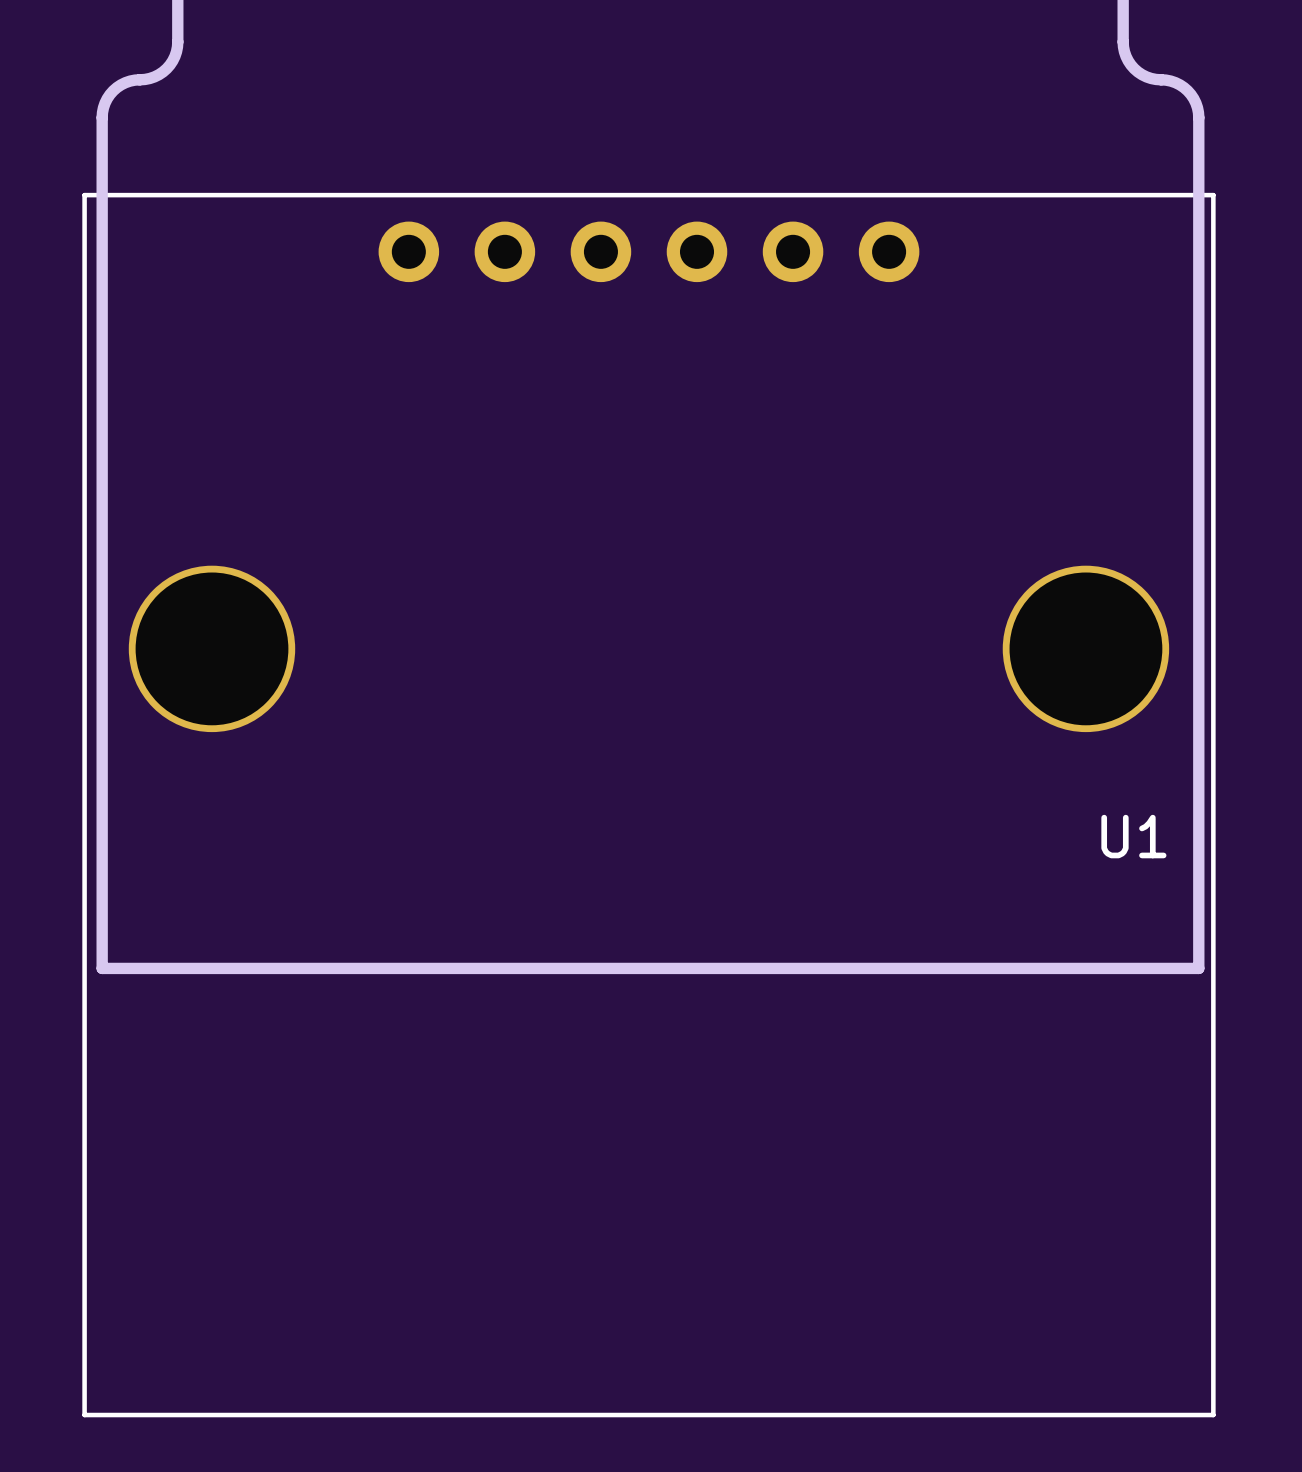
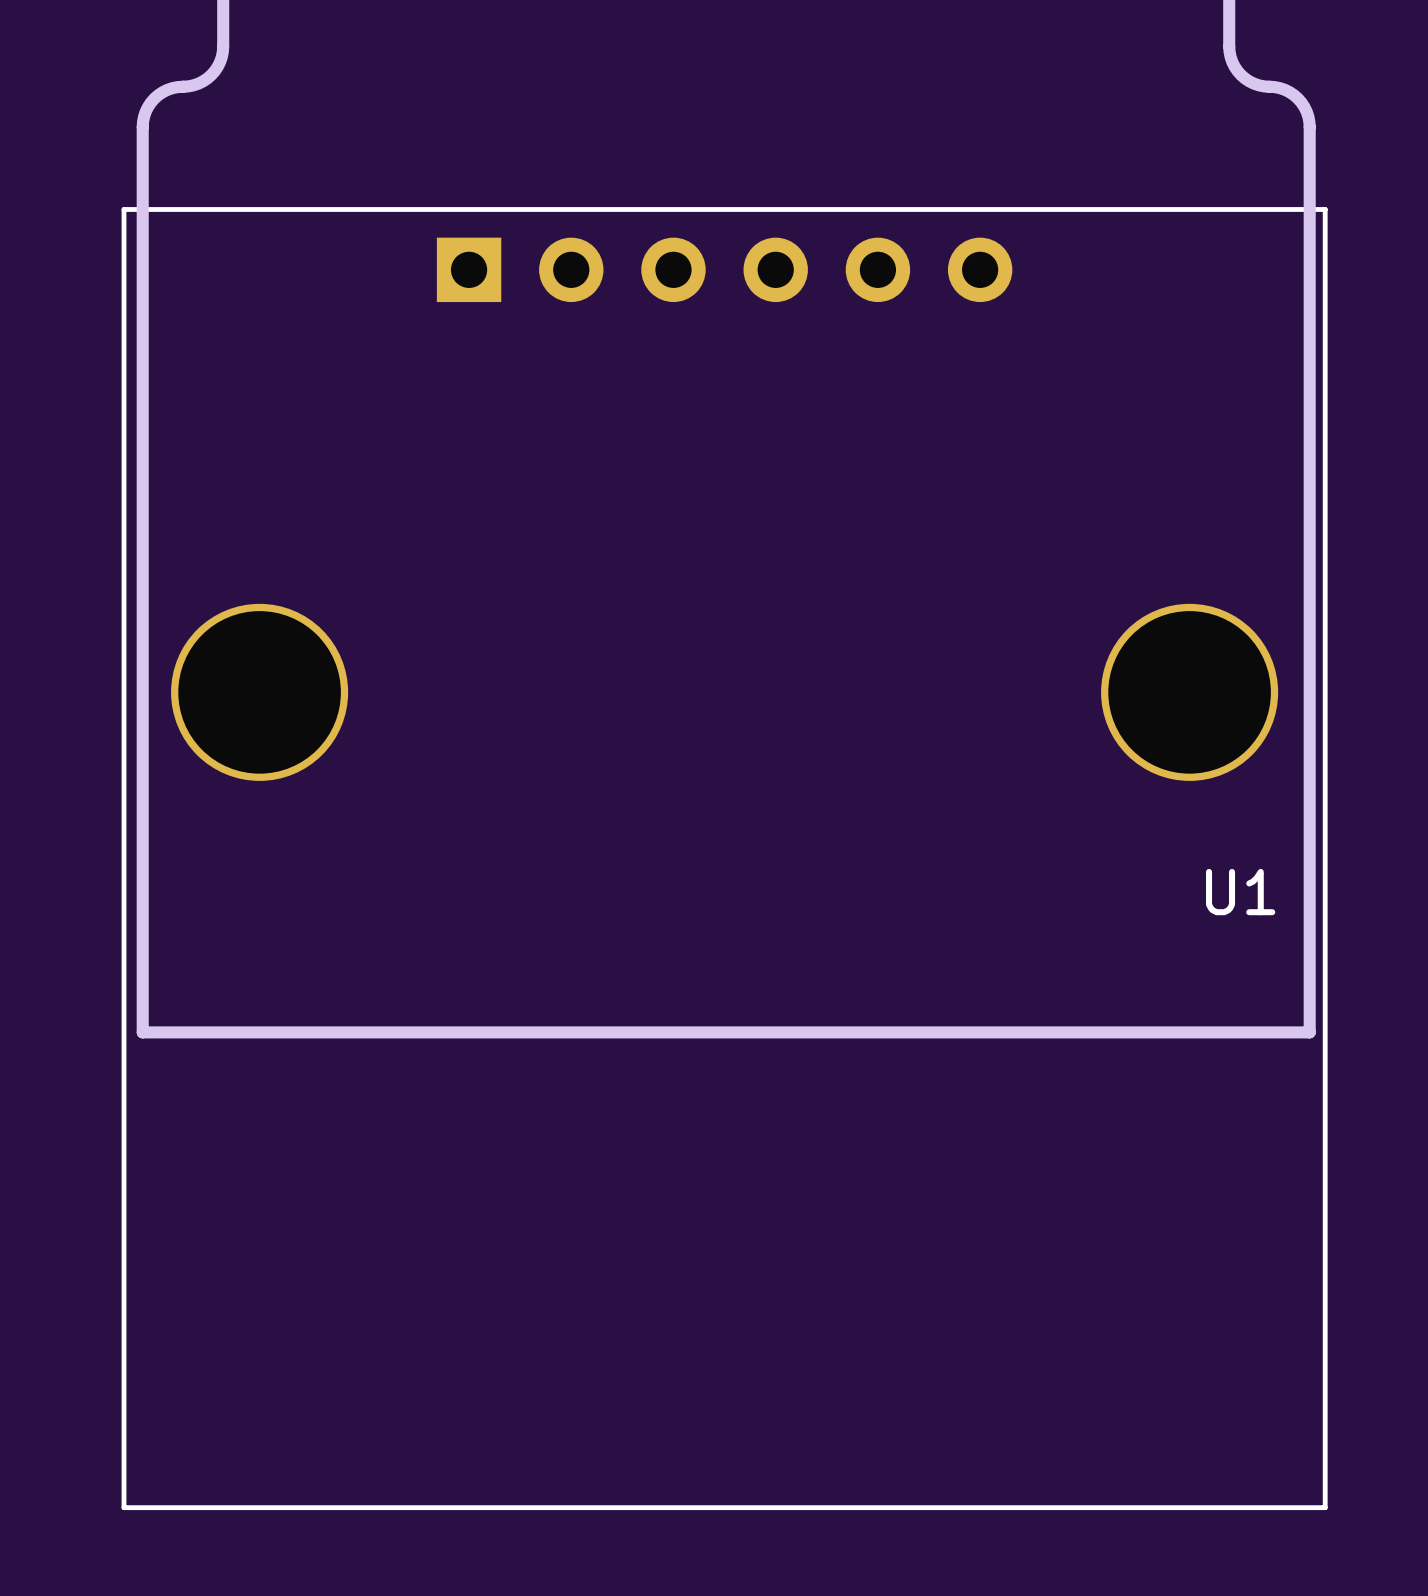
U1 footprint: [82, 192, 1216, 1418] -> [121, 207, 1328, 1511]

